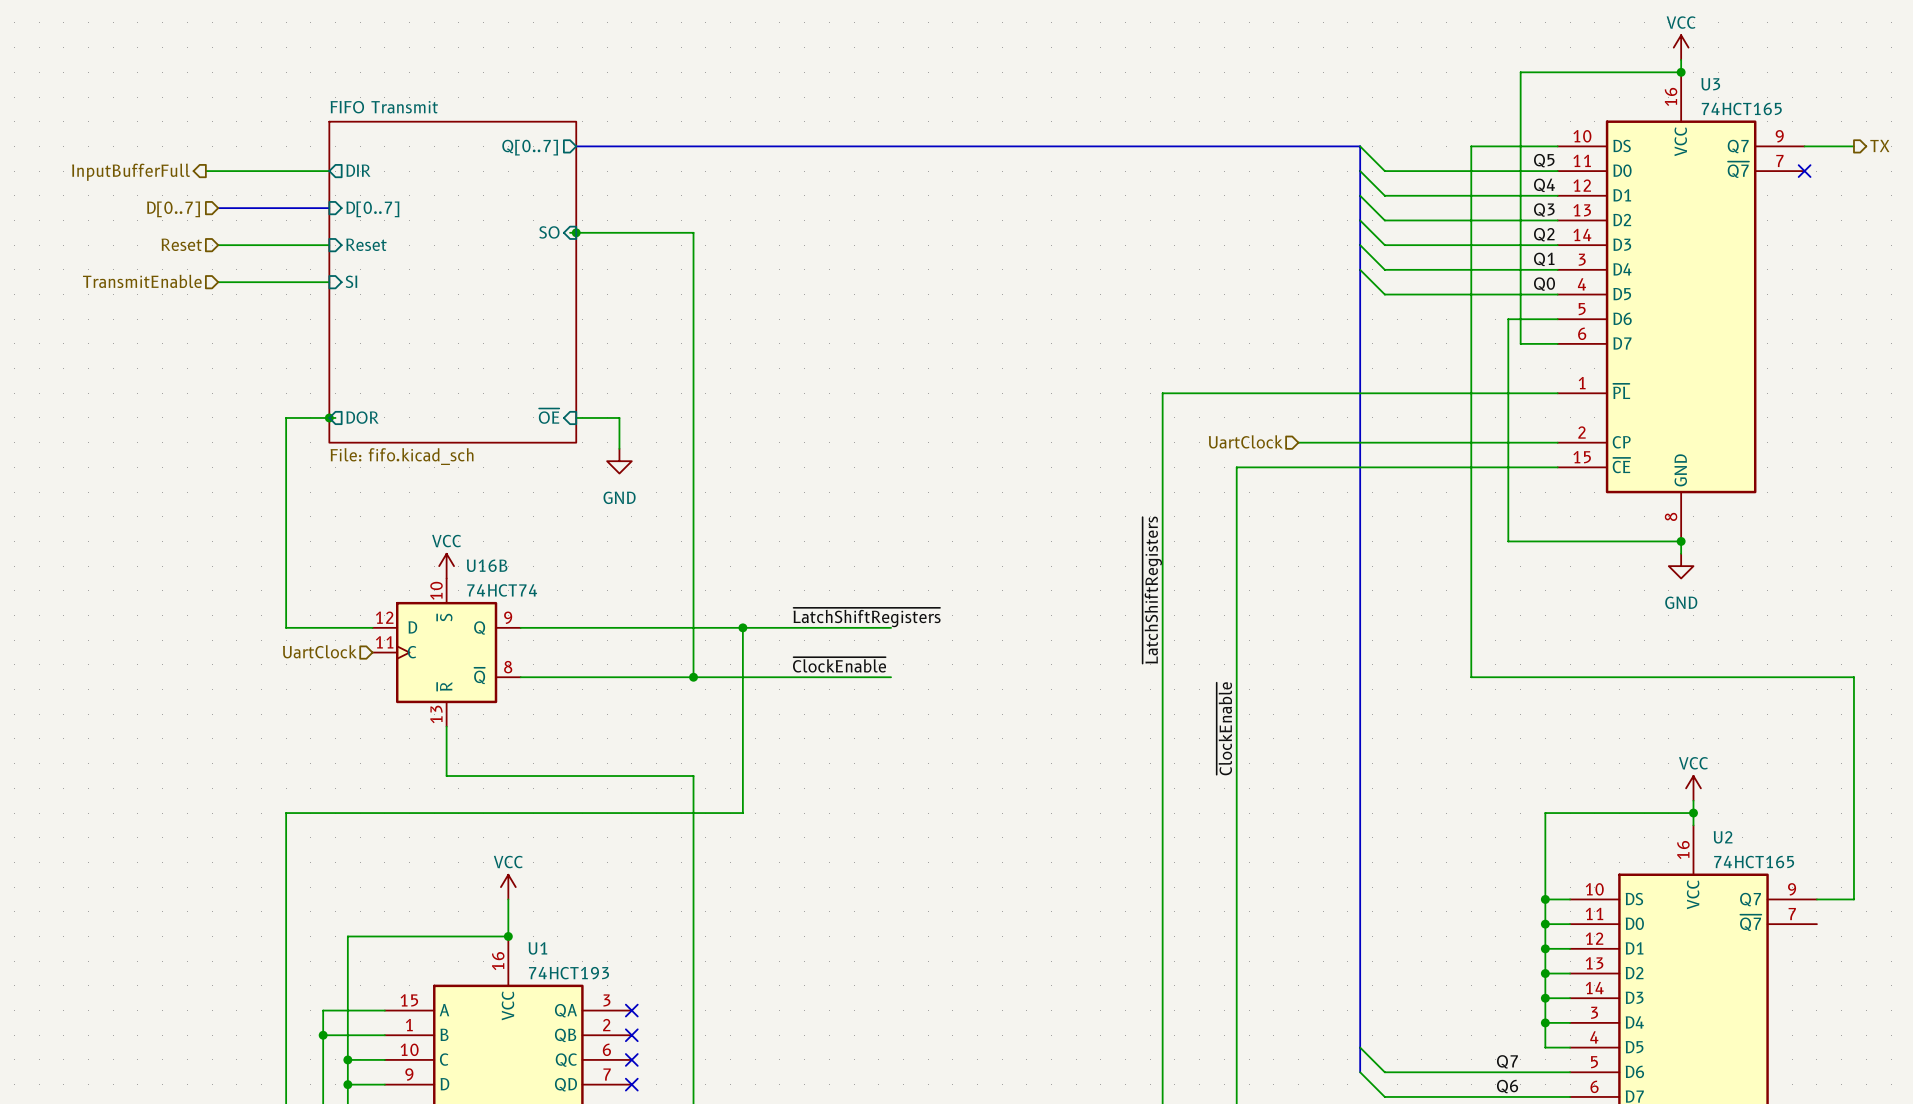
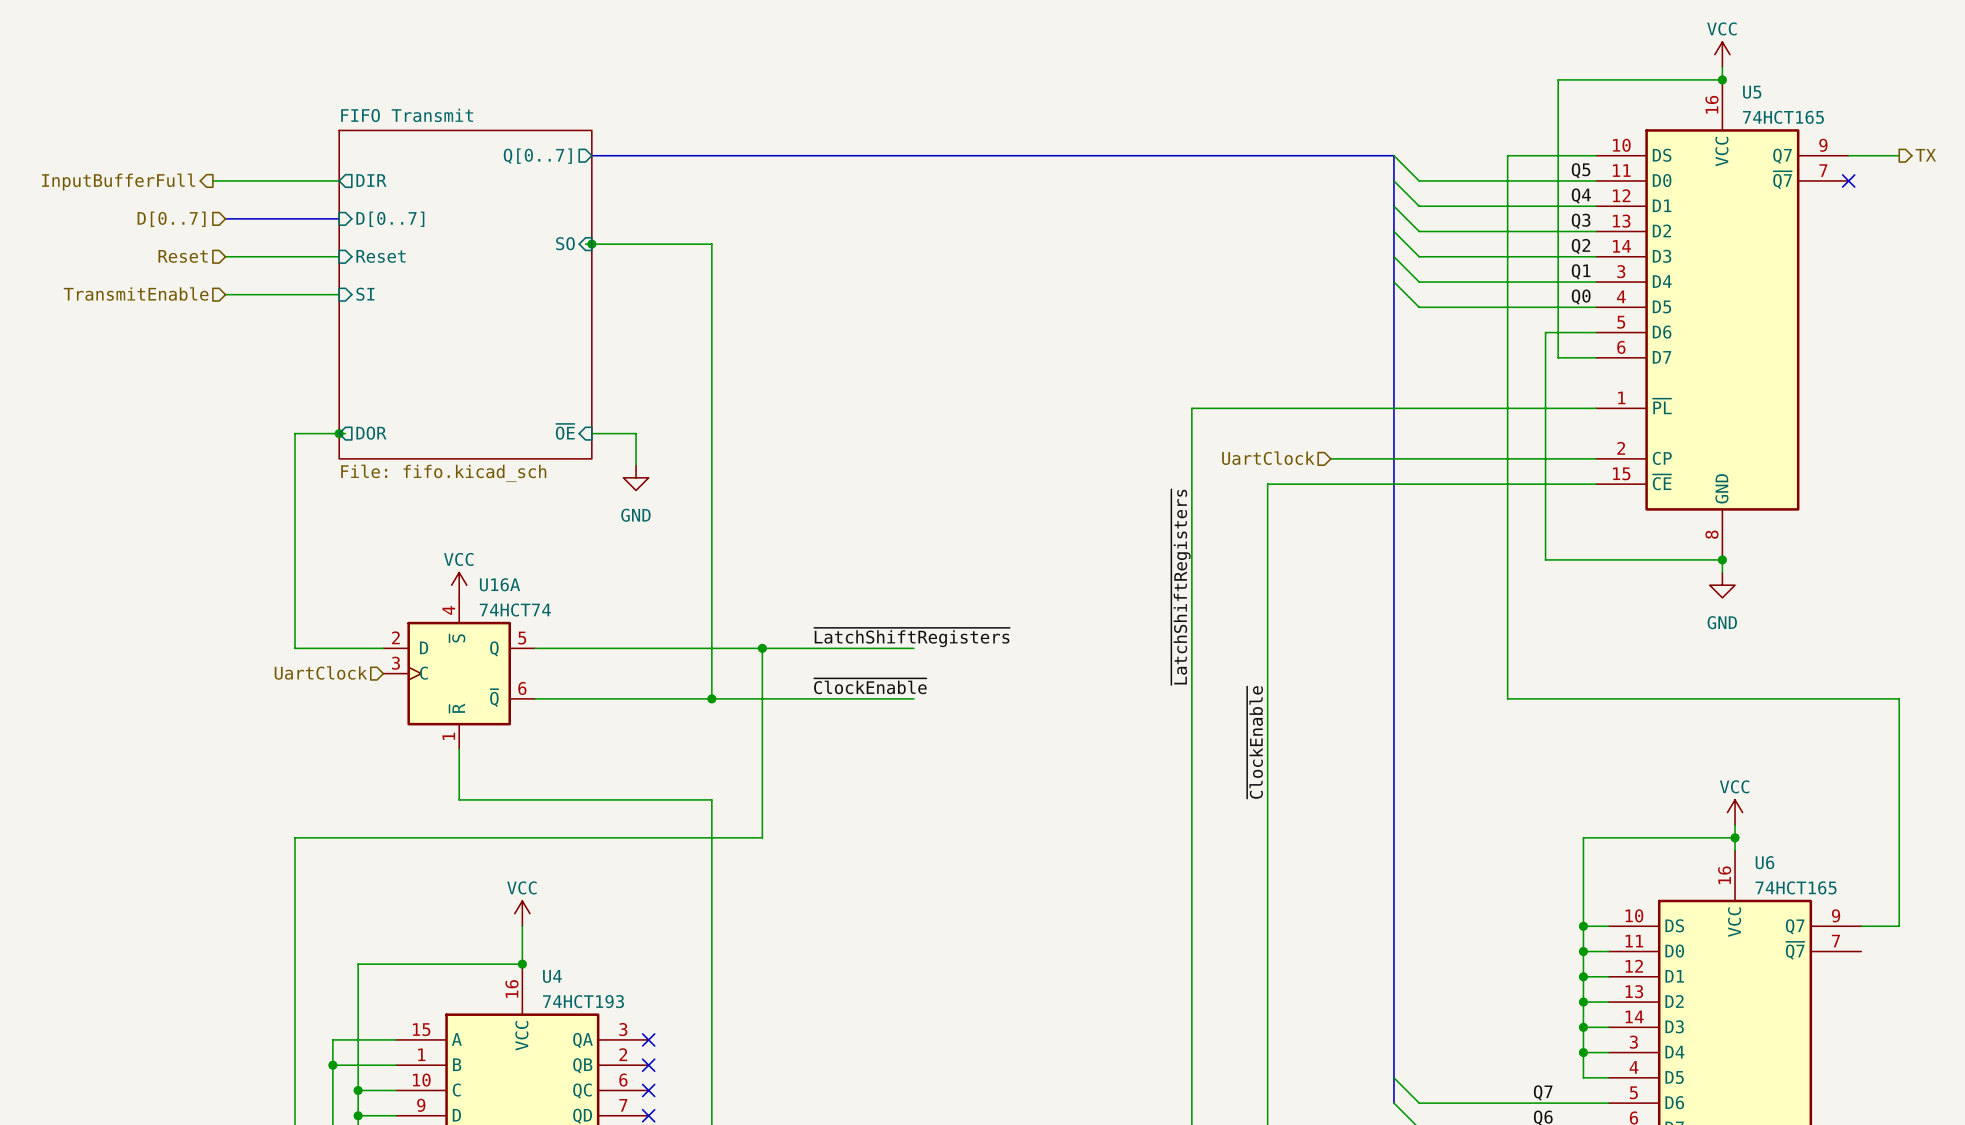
U3 name: U3 (1710, 84) -> U5 (1752, 92)
U16B name: U16B (487, 565) -> U16A (499, 584)
U16B pin number: 10 (436, 590) -> 4 (448, 610)
U16B pin number: 12 (384, 617) -> 2 (395, 637)
U16B pin number: 9 (508, 617) -> 5 (522, 638)
U16B pin number: 11 (384, 642) -> 3 (395, 663)
U16B pin number: 8 (508, 667) -> 6 (522, 688)
U16B pin number: 13 (436, 714) -> 1 (448, 736)
U2 name: U2 (1723, 837) -> U6 (1764, 862)
U1 name: U1 (537, 948) -> U4 (552, 976)

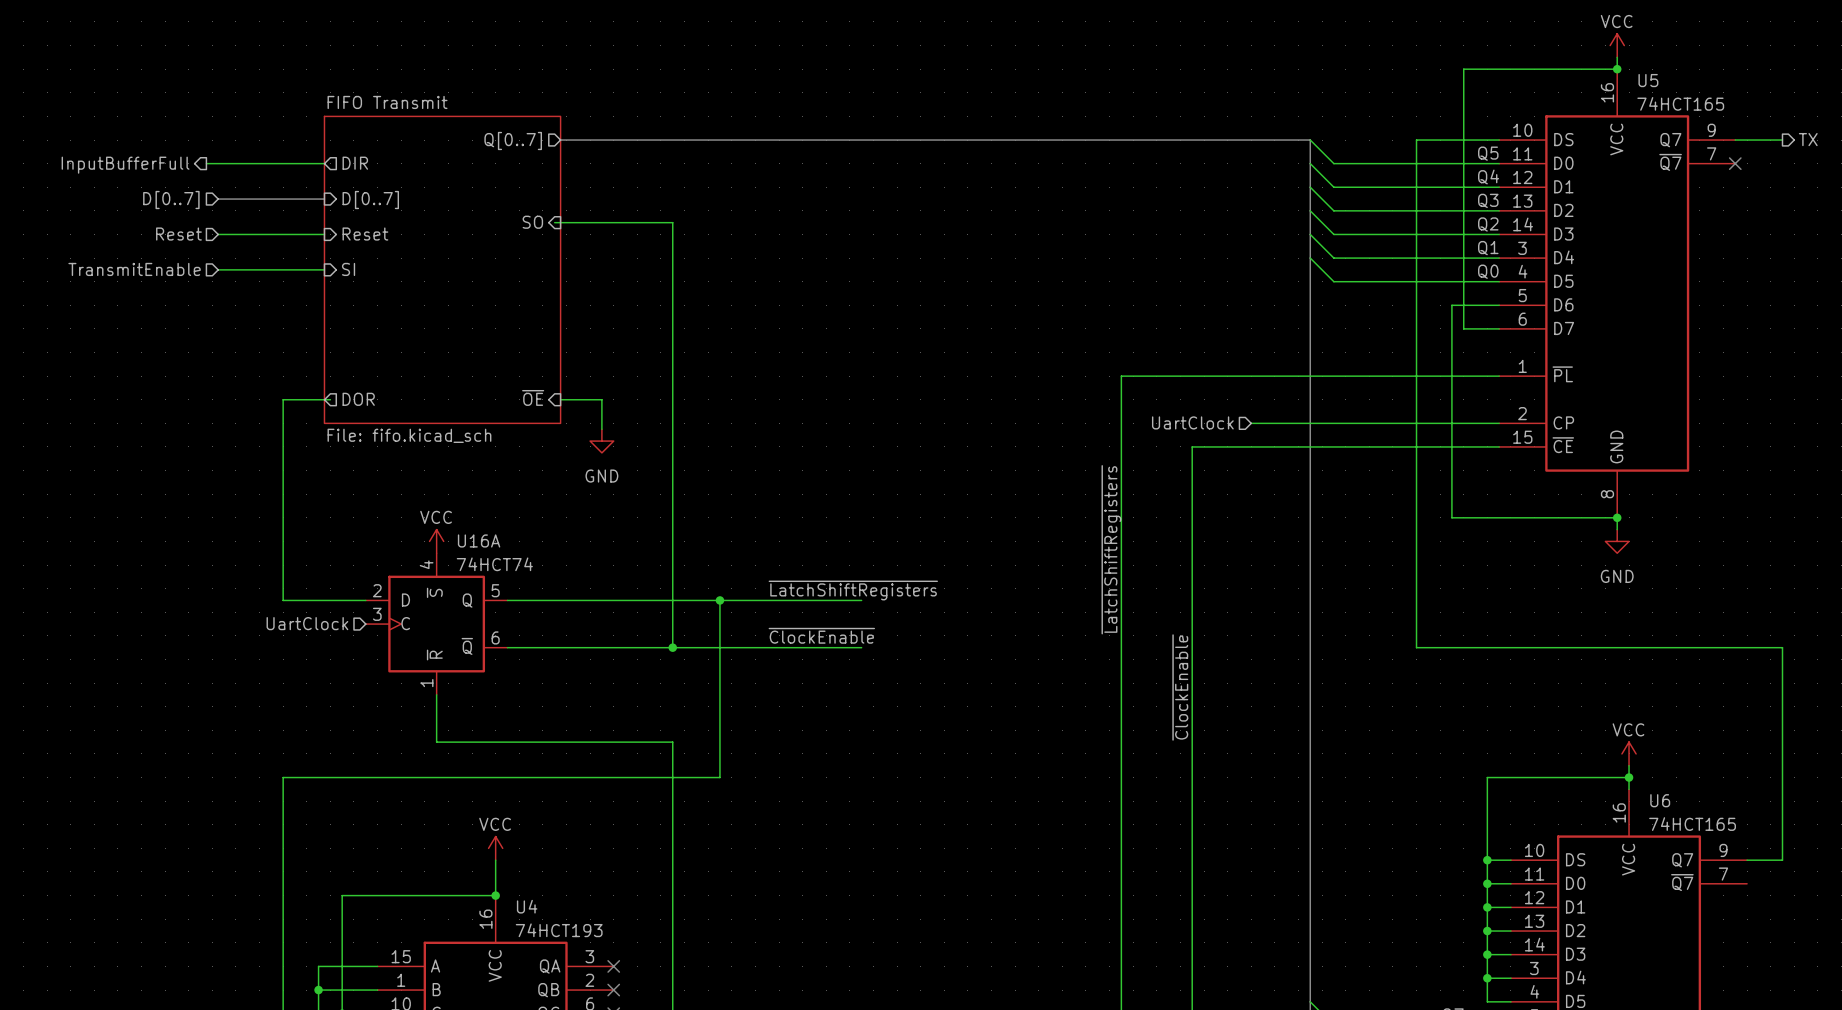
junction: (591, 244) -> none
junction: (339, 433) -> none

